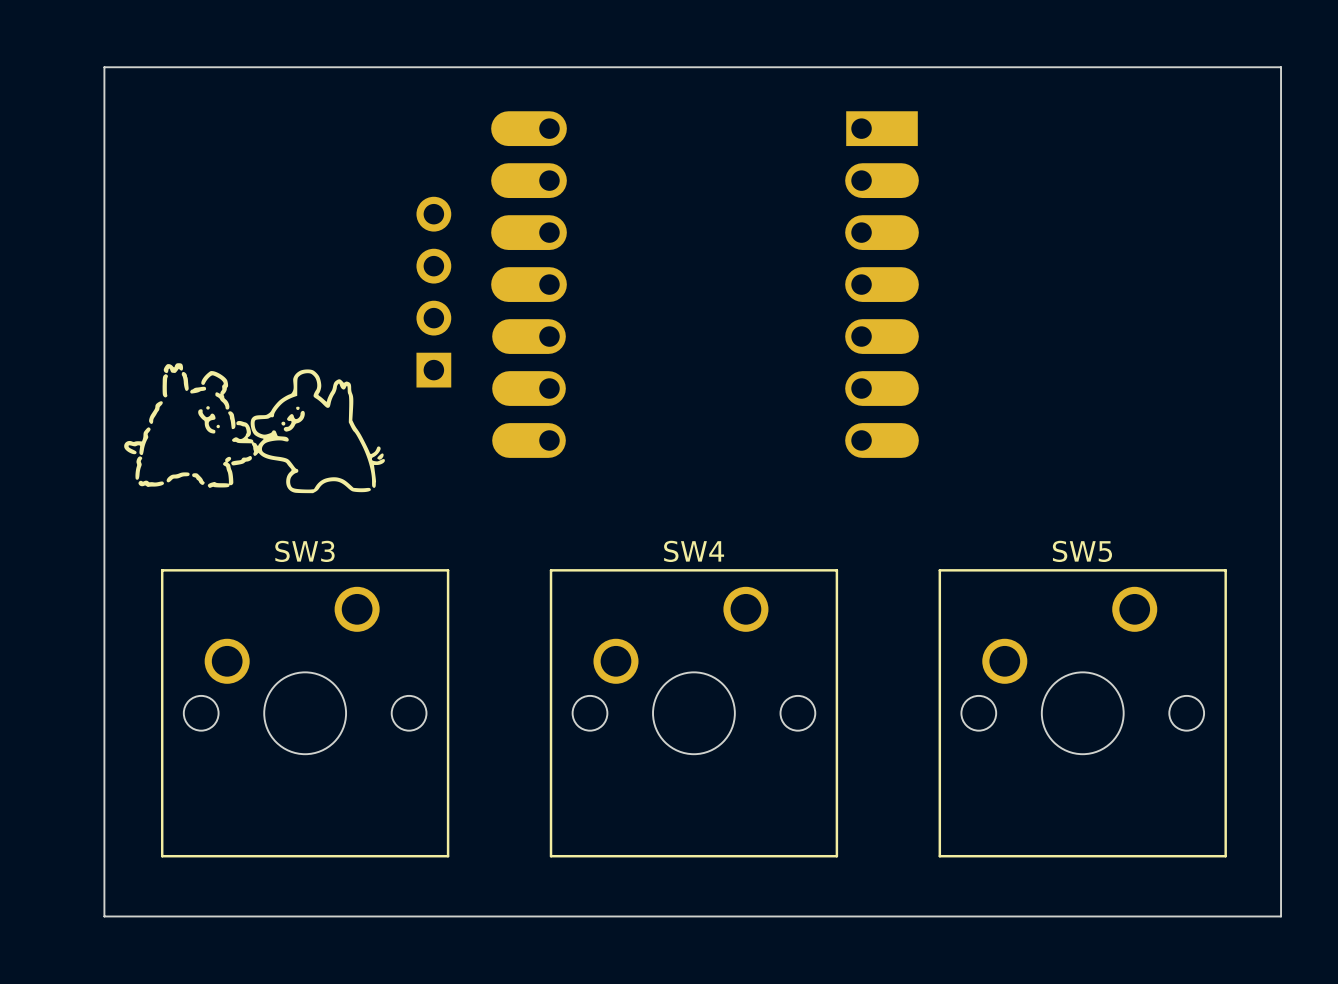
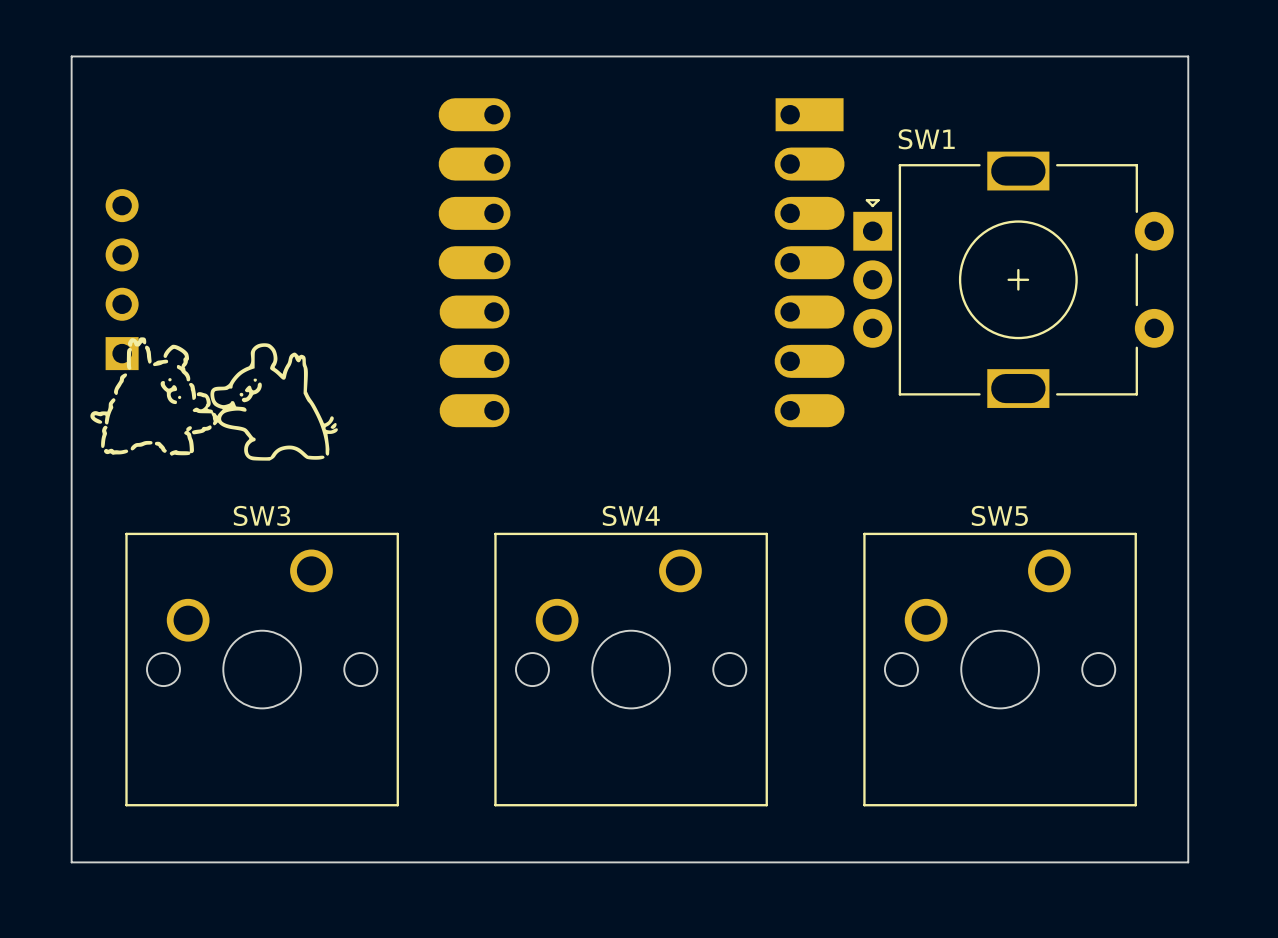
part position: (433, 292) -> (122, 279)
SW1: none -> (1013, 279)

